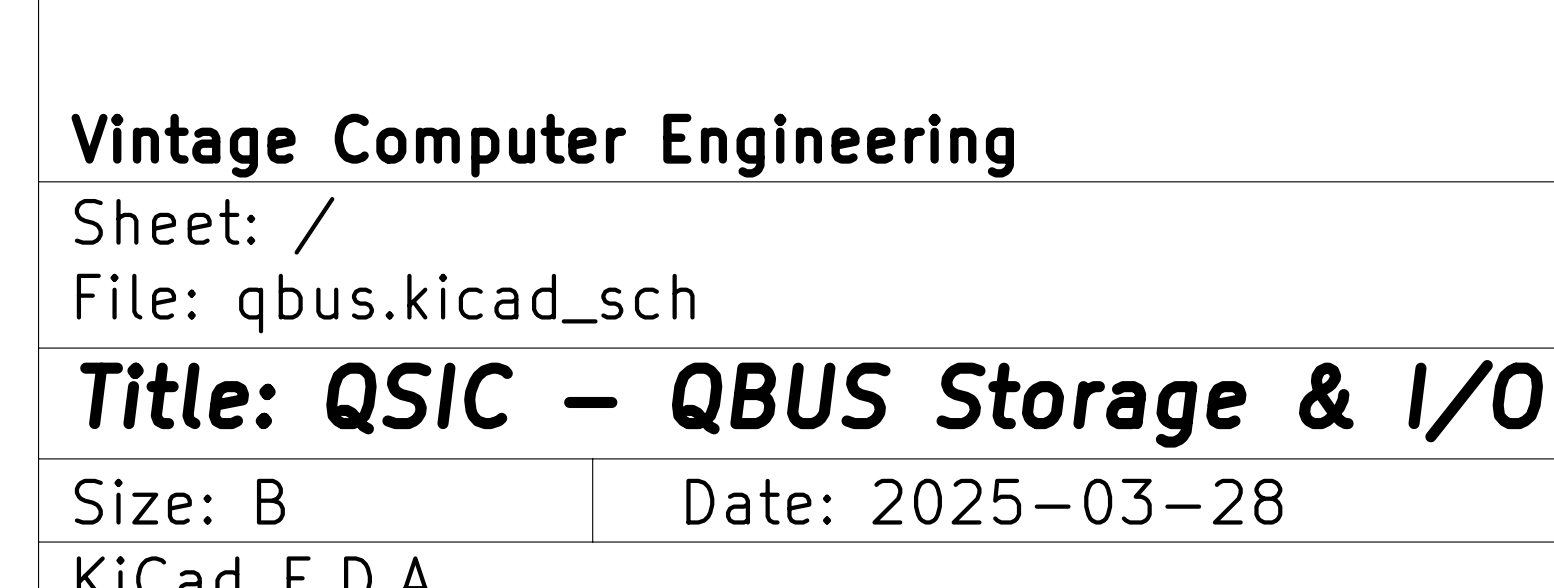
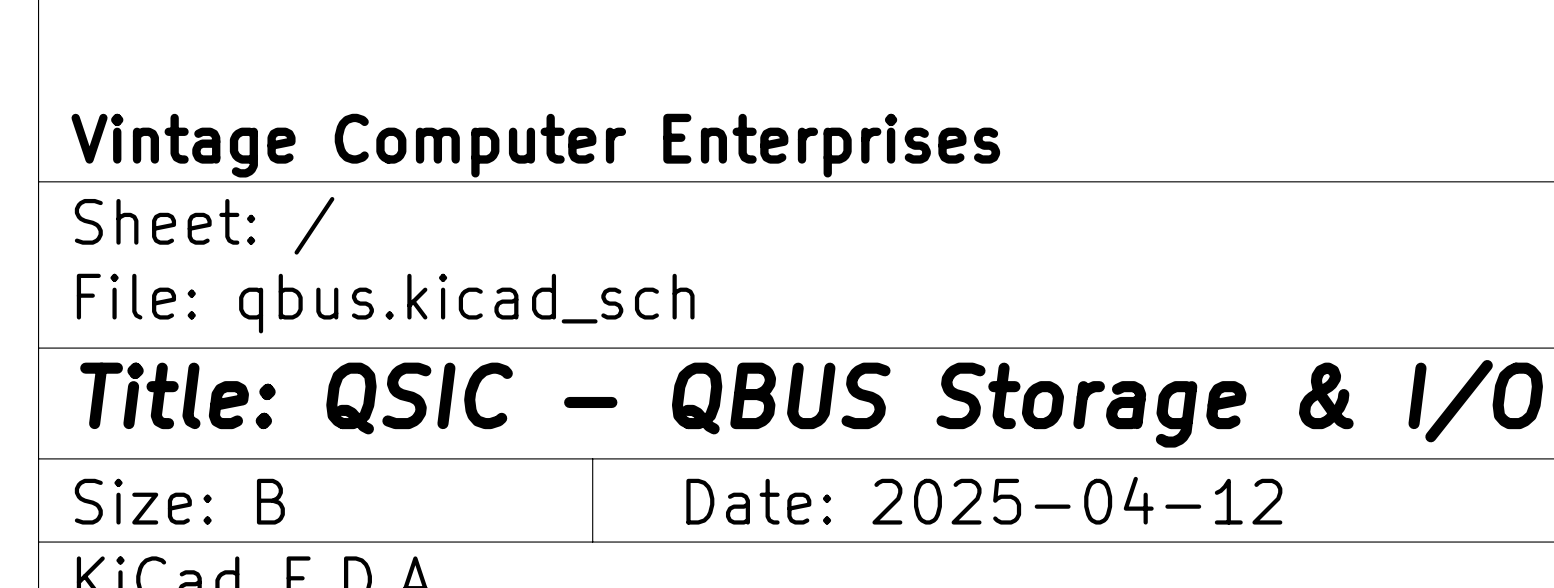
title block: Vintage Computer Engineering (542, 145) -> Vintage Computer Enterprises (535, 145)
title block: Date: 2025-03-28 (984, 501) -> Date: 2025-04-12 (984, 500)

